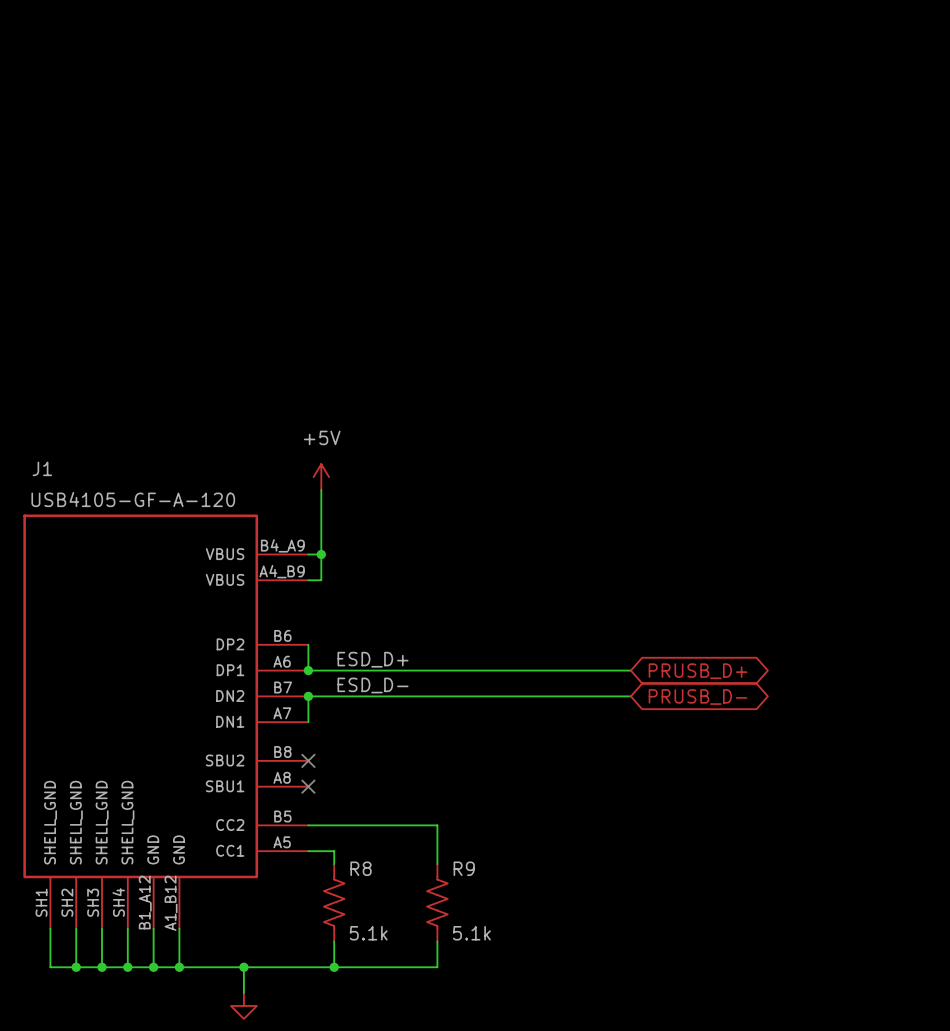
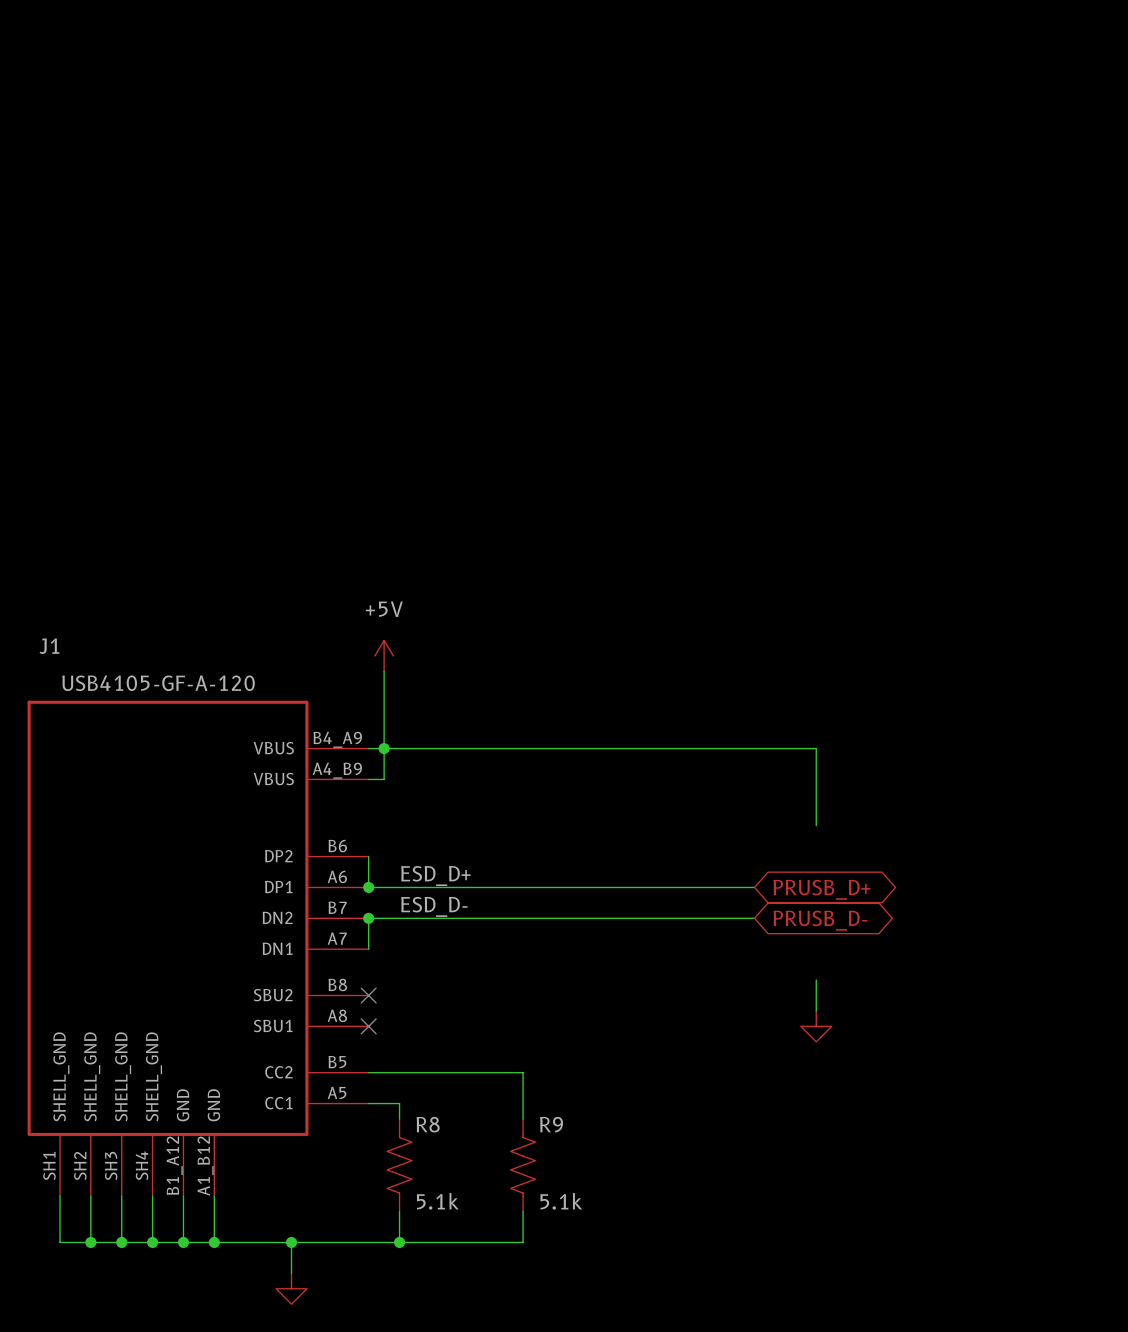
wire: none -> (384, 748) (816, 748) (816, 825)
wire: none -> (816, 980) (816, 1010)
power symbol: none -> (816, 1026)

